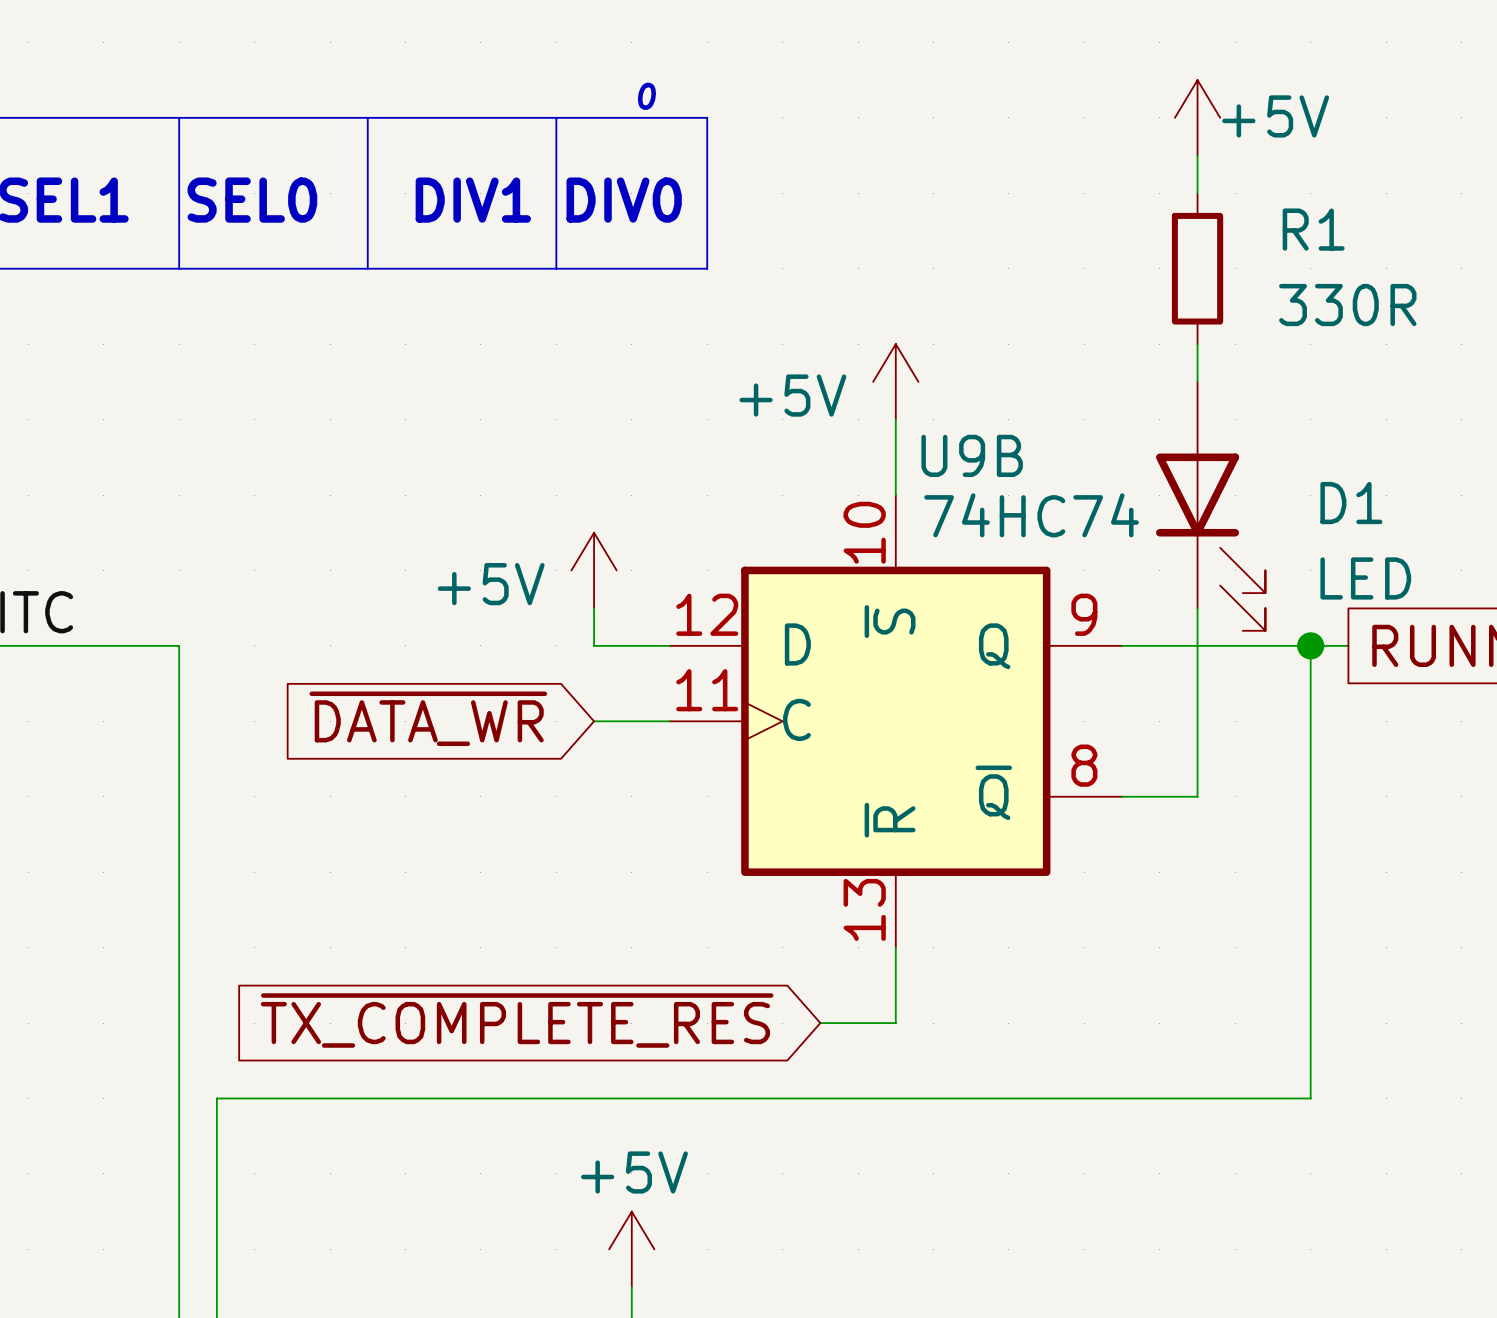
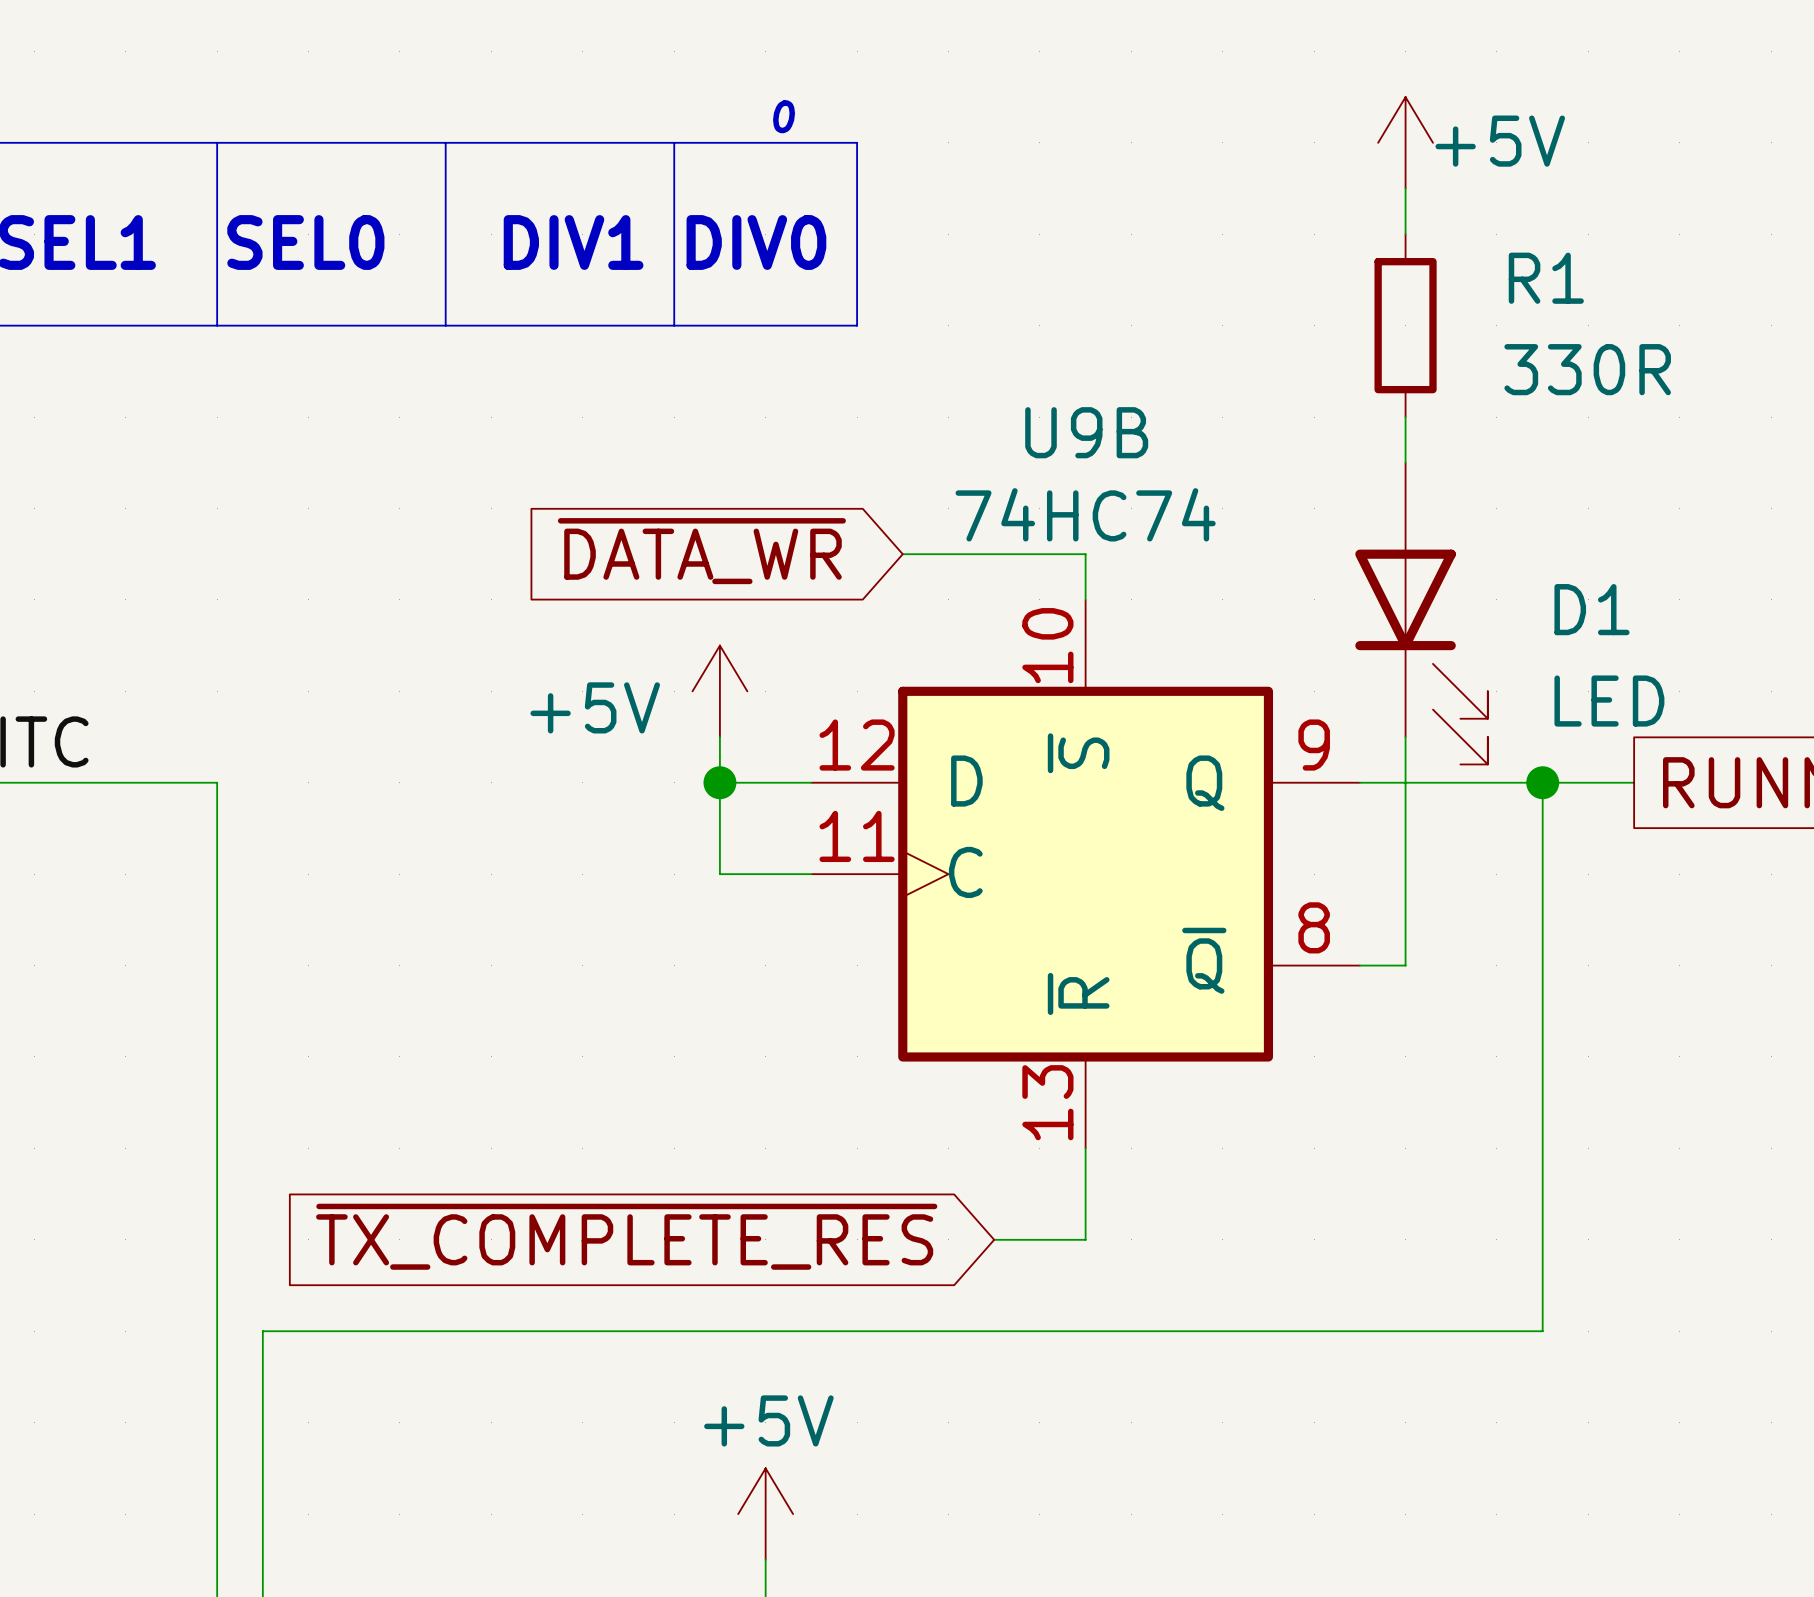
power symbol position: +5V (1197, 117) -> +5V (1405, 142)
wire: (1197, 155) (1197, 193) -> (1405, 188) (1405, 234)
R1 position: (1197, 268) -> (1405, 325)
wire: (1197, 344) (1197, 381) -> (1405, 417) (1405, 462)
power symbol: +5V (895, 381) -> none
wire: (895, 419) (895, 457) -> (902, 554) (1085, 554)
U9B name position: U9B (972, 455) -> U9B (1086, 432)
D1 position: (1210, 506) -> (1421, 613)
U9B value position: 74HC74 (1031, 515) -> 74HC74 (1085, 514)
wire: (1197, 608) (1197, 796) (1159, 796) -> (1405, 737) (1405, 965)
wire: none -> (719, 782) (719, 874)
junction: none -> (719, 782)
wire: (1310, 645) (1310, 1098) (1272, 1098) -> (1542, 782) (1542, 1331)
junction position: (1310, 645) -> (1542, 782)
global label position: ~{DATA_WR} (428, 718) -> ~{DATA_WR} (701, 551)

